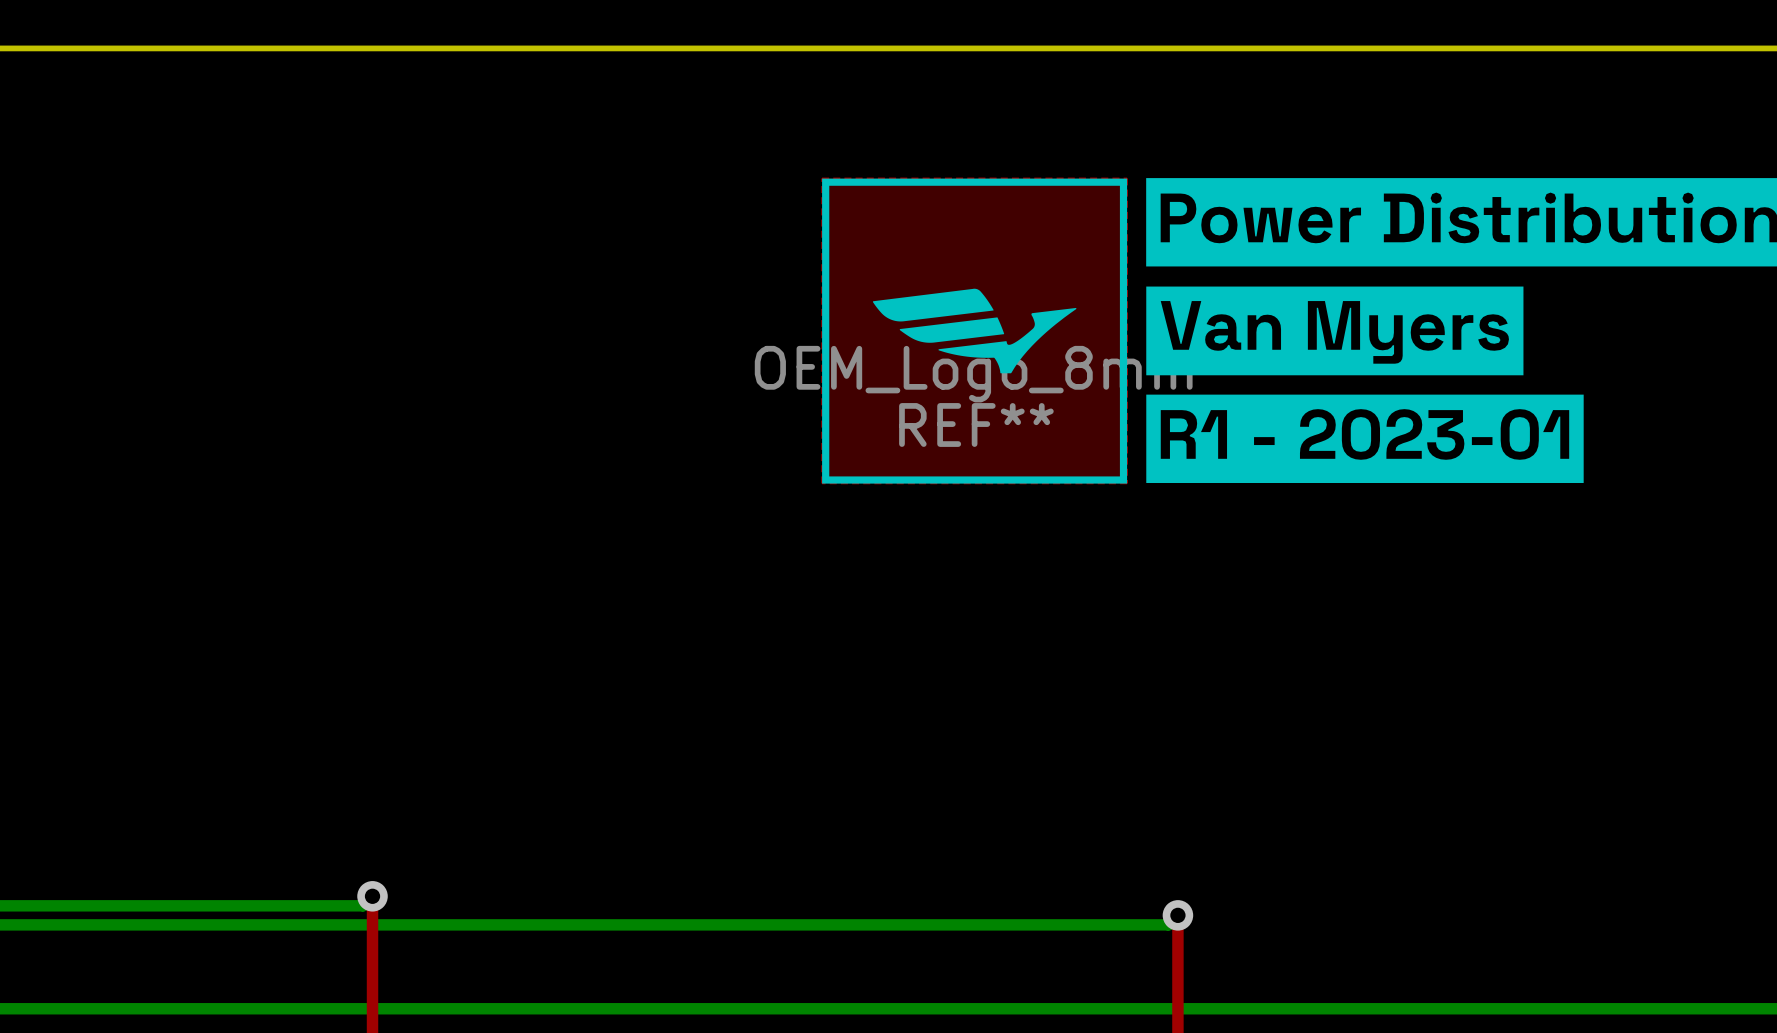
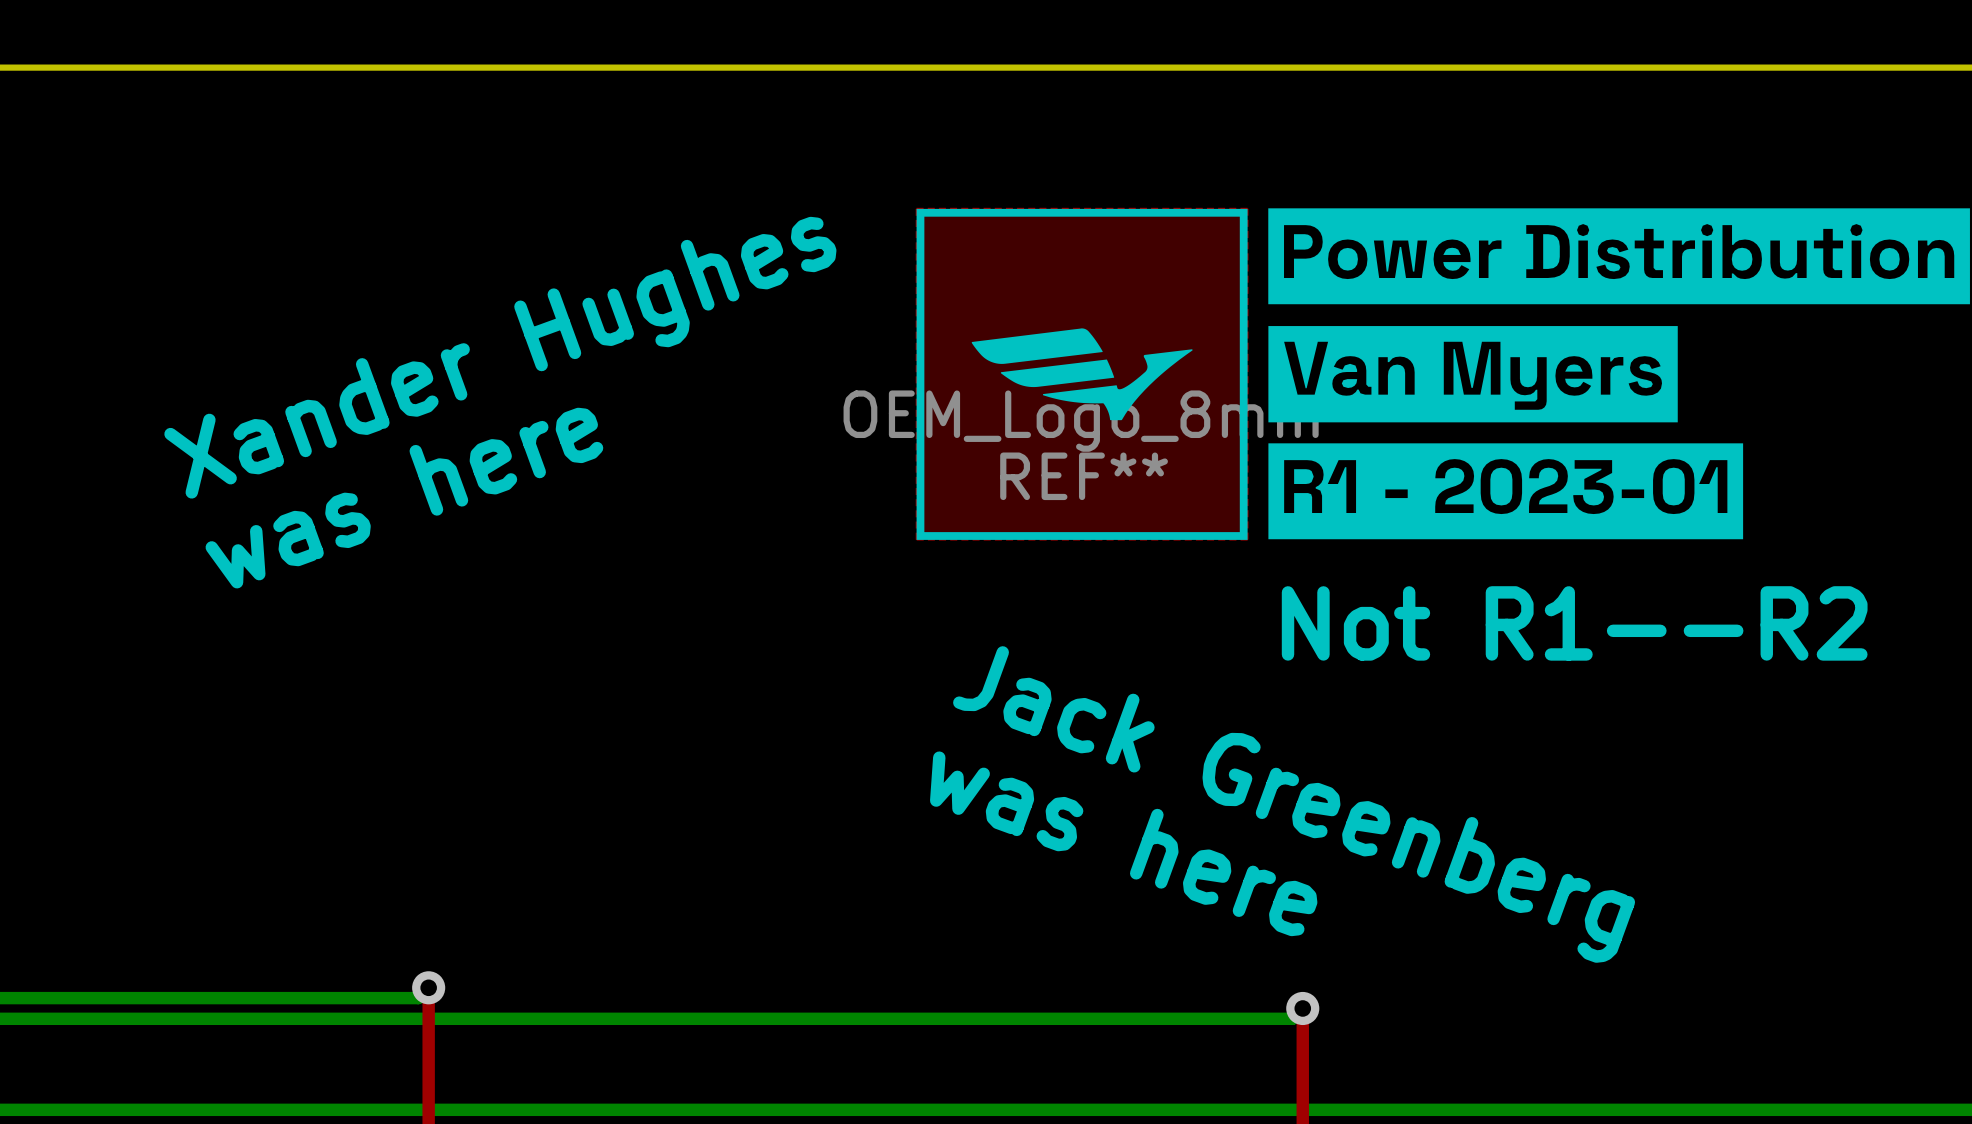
text: none -> Xander Hughes (500, 357)
text: none -> was here (404, 498)
text: none -> Not R1--R2 (1574, 623)
text: none -> Jack Greenberg (1294, 804)
text: none -> was here (1123, 843)

